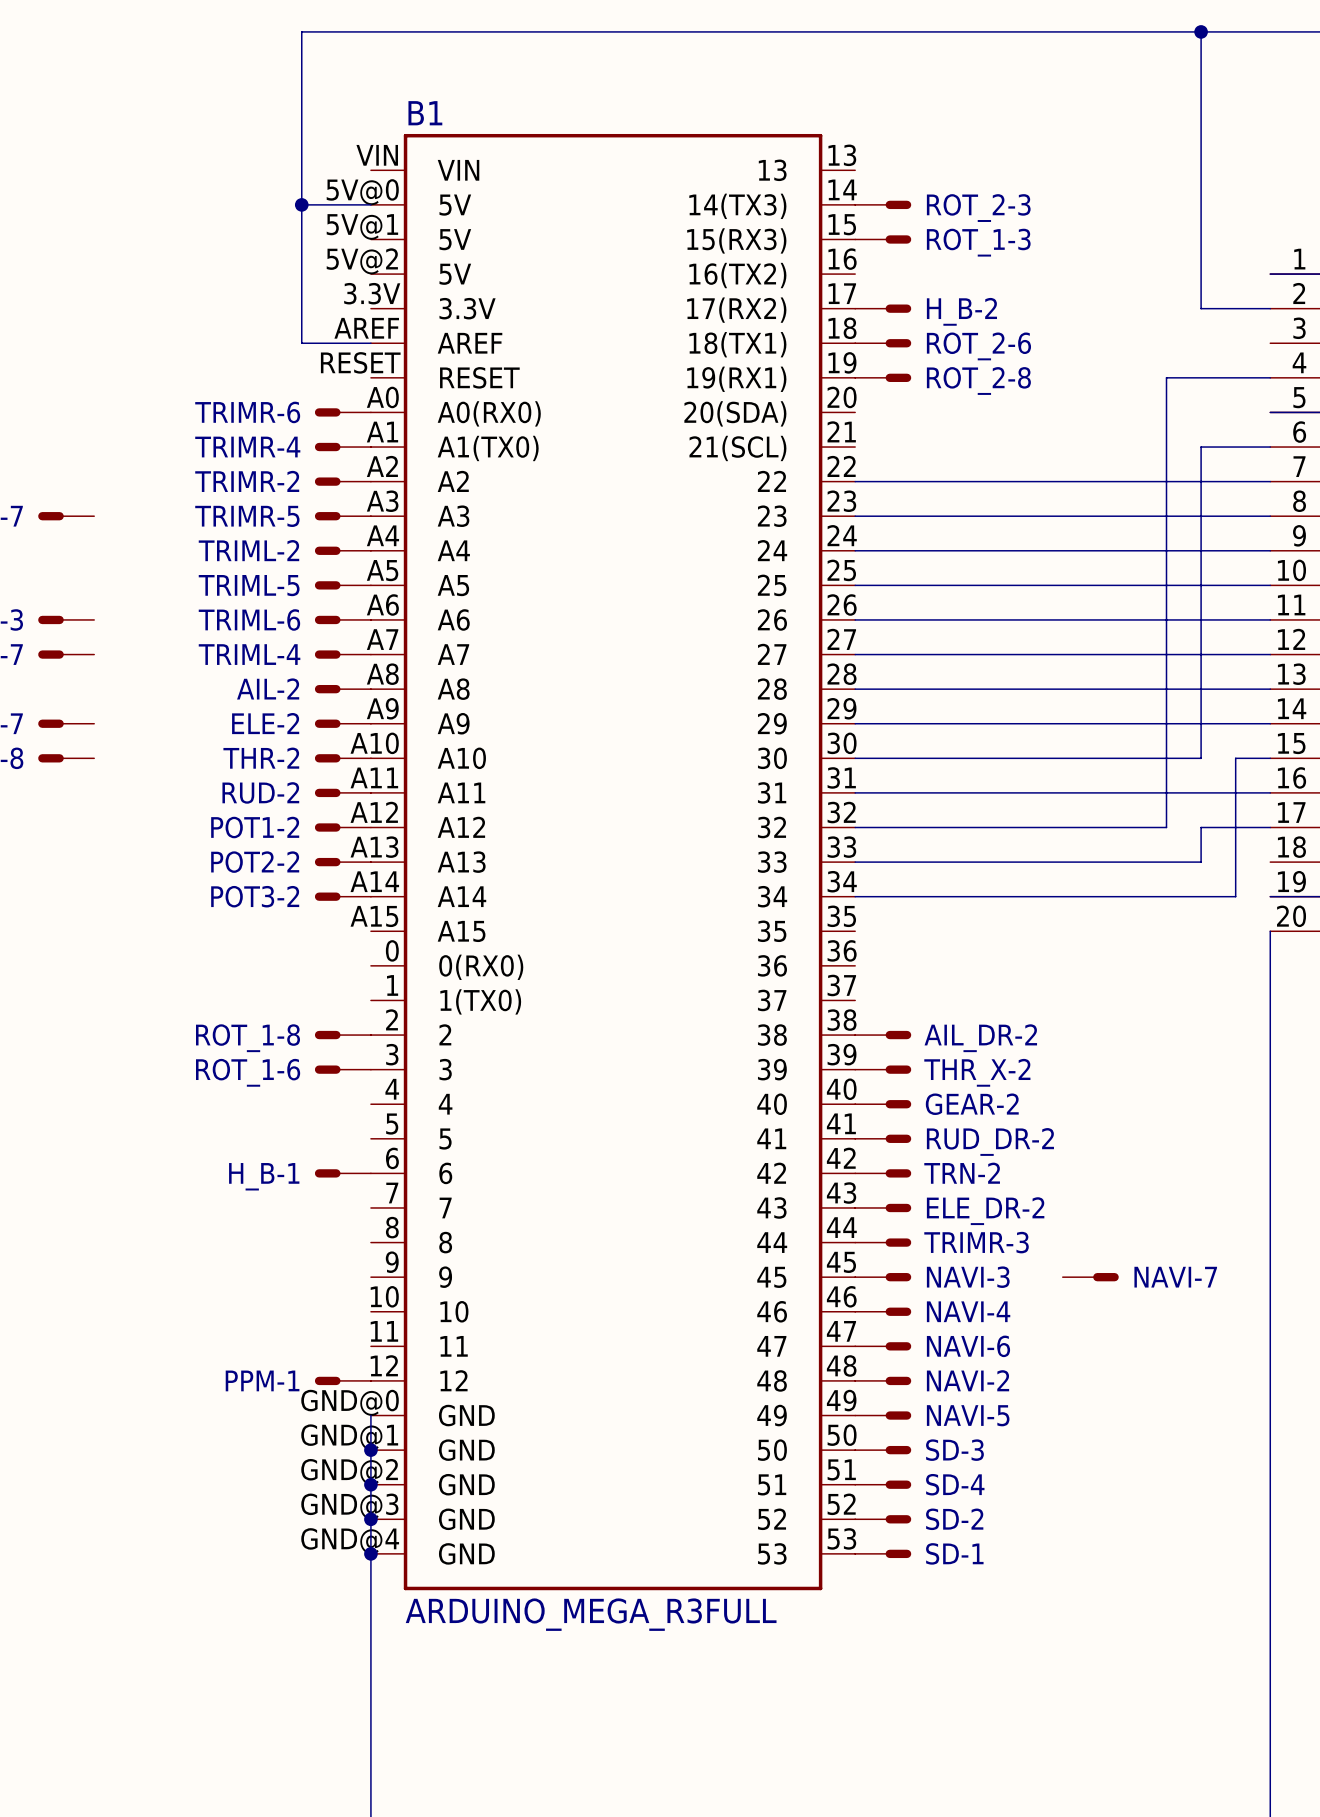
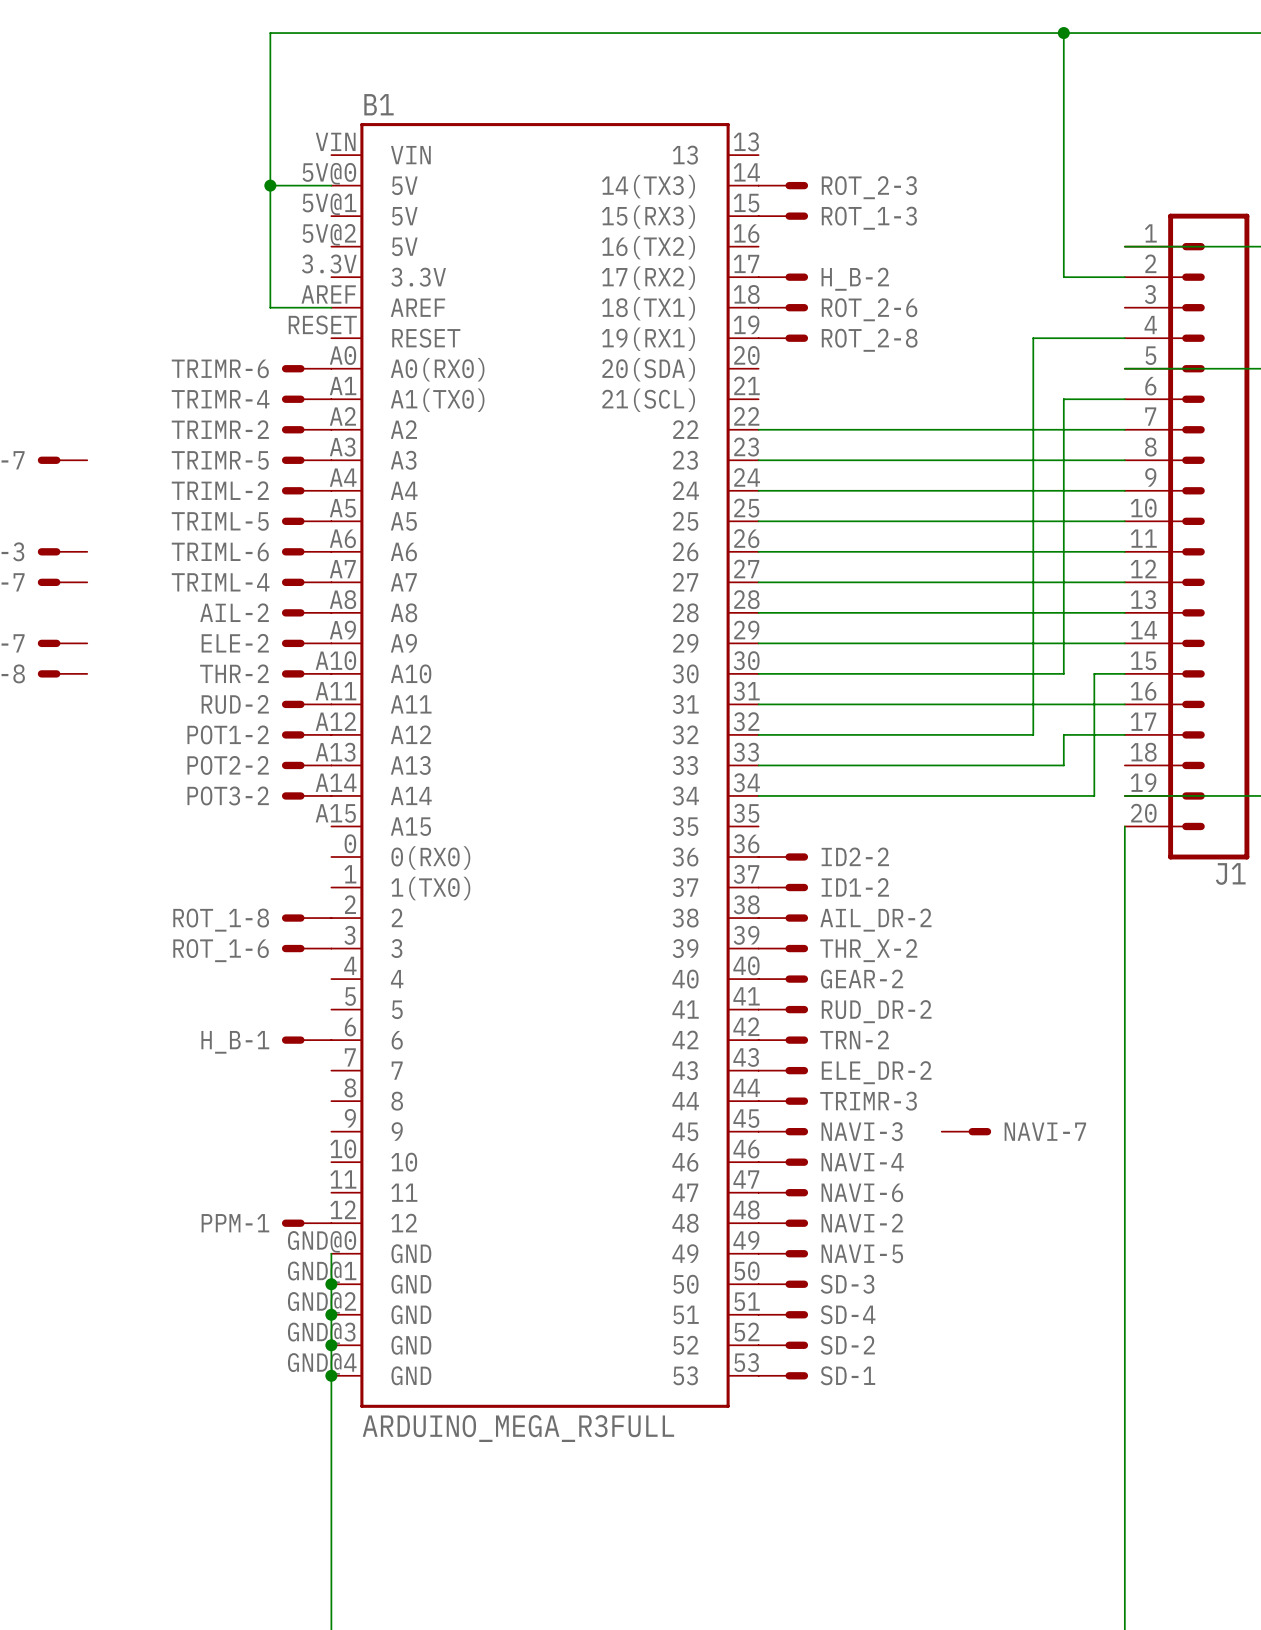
ID2-2: none -> (783, 857)
ID1-2: none -> (783, 887)

